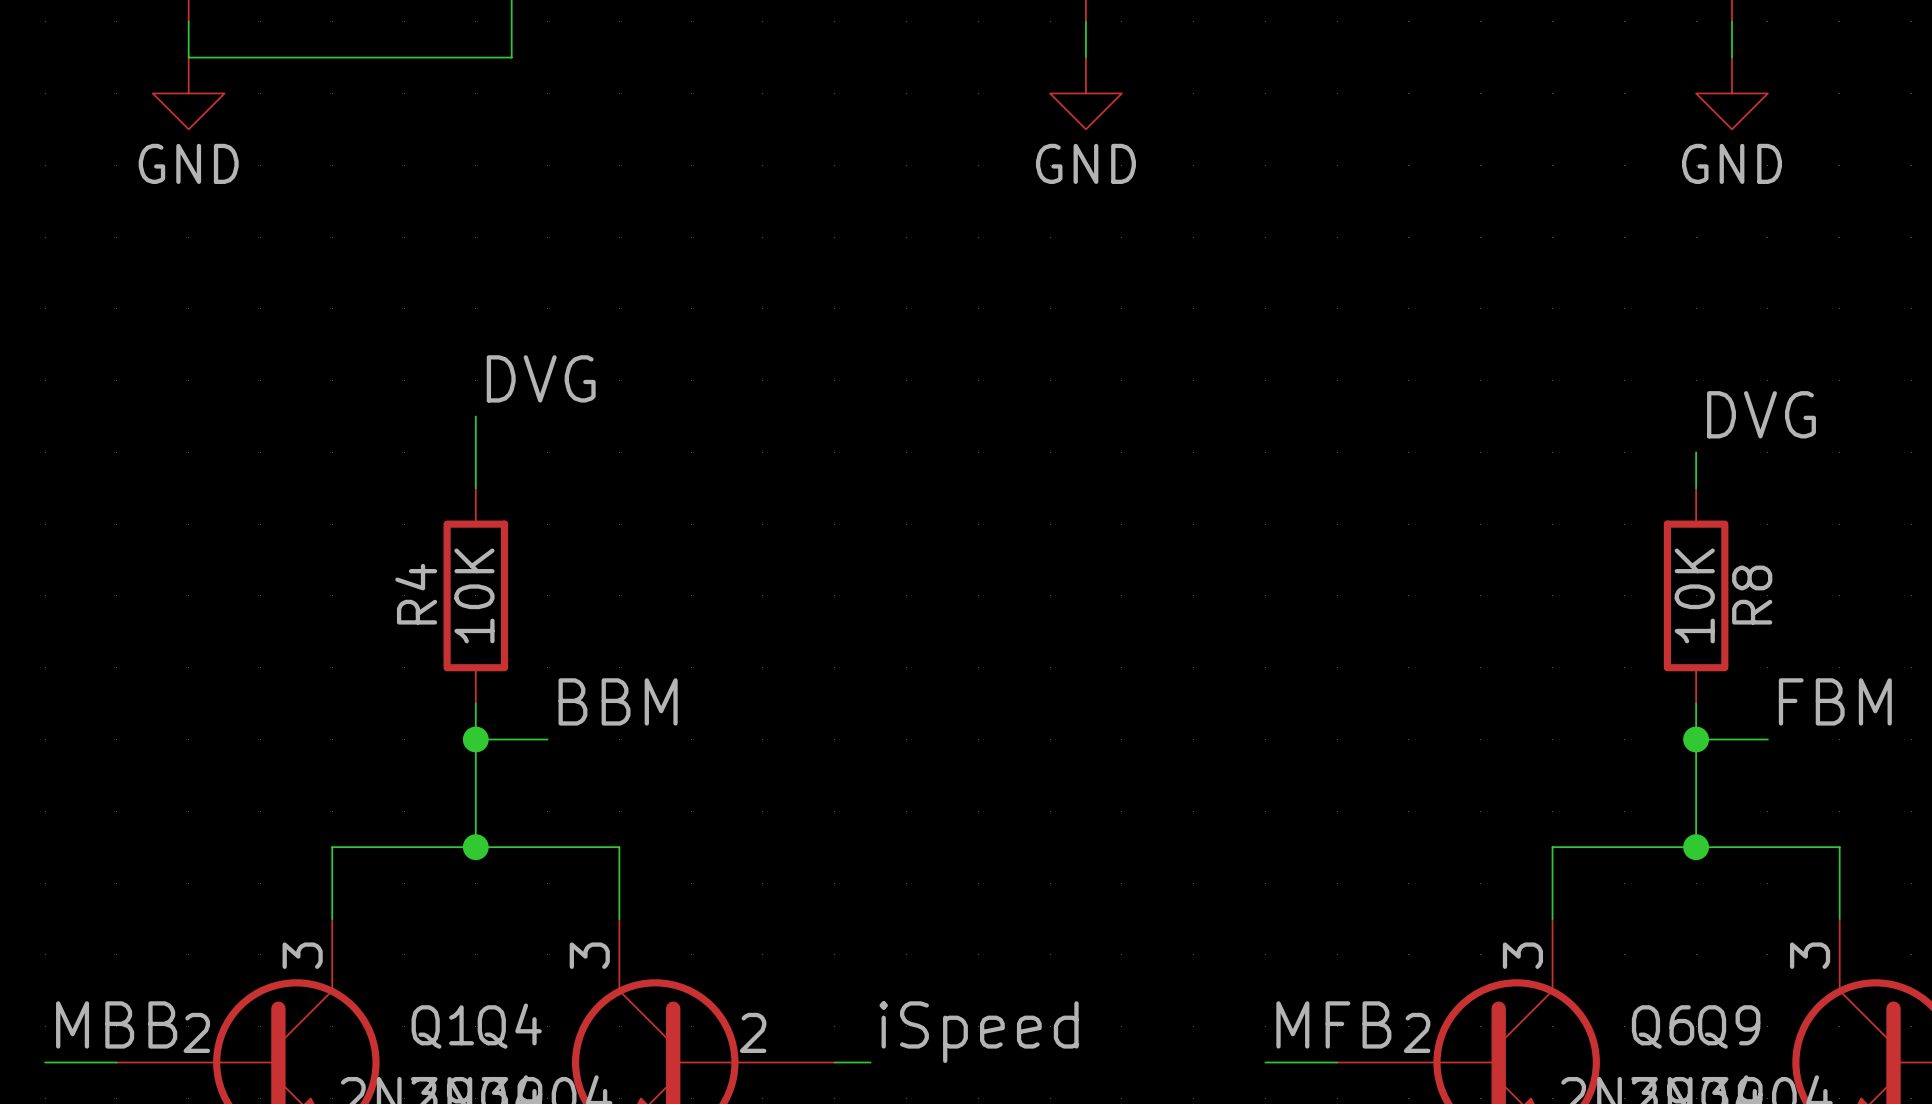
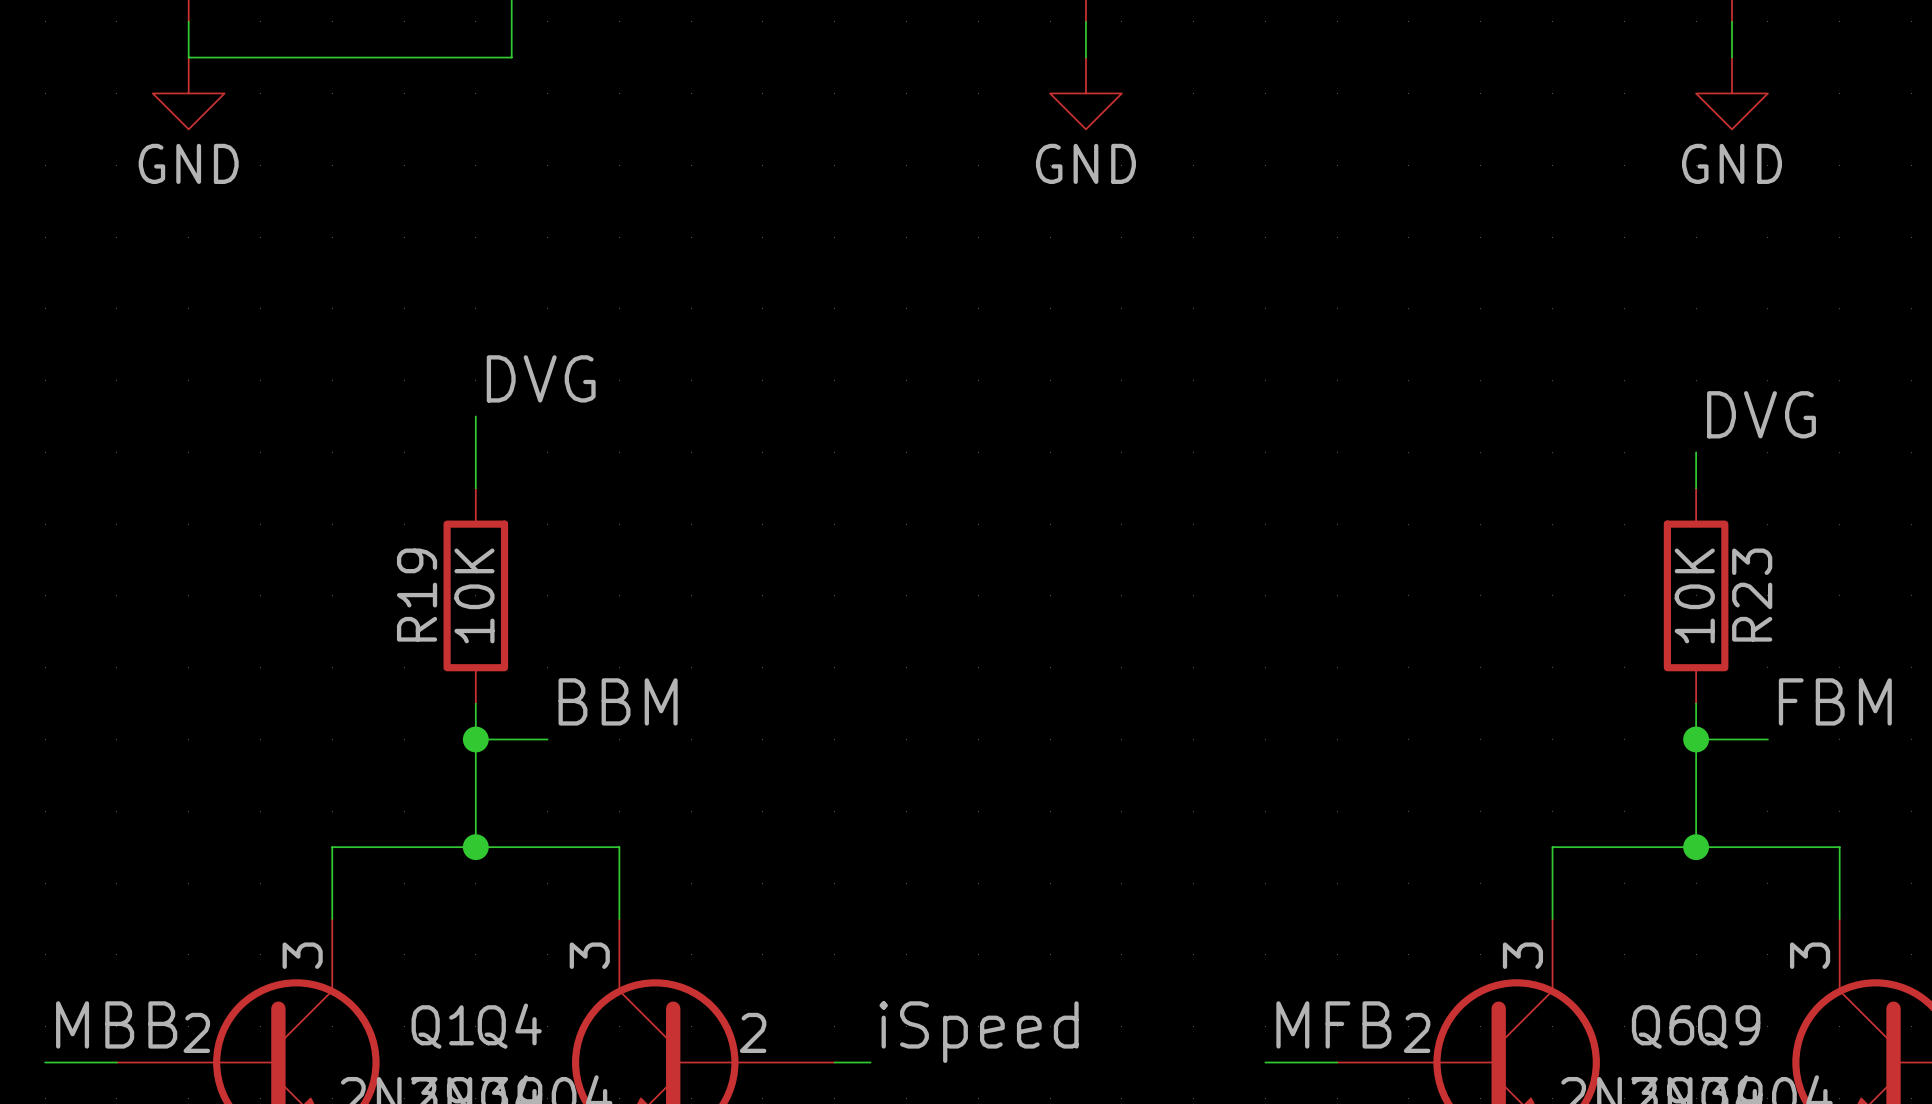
R4 name: R4 (416, 594) -> R19 (417, 595)
R8 name: R8 (1752, 595) -> R23 (1752, 595)

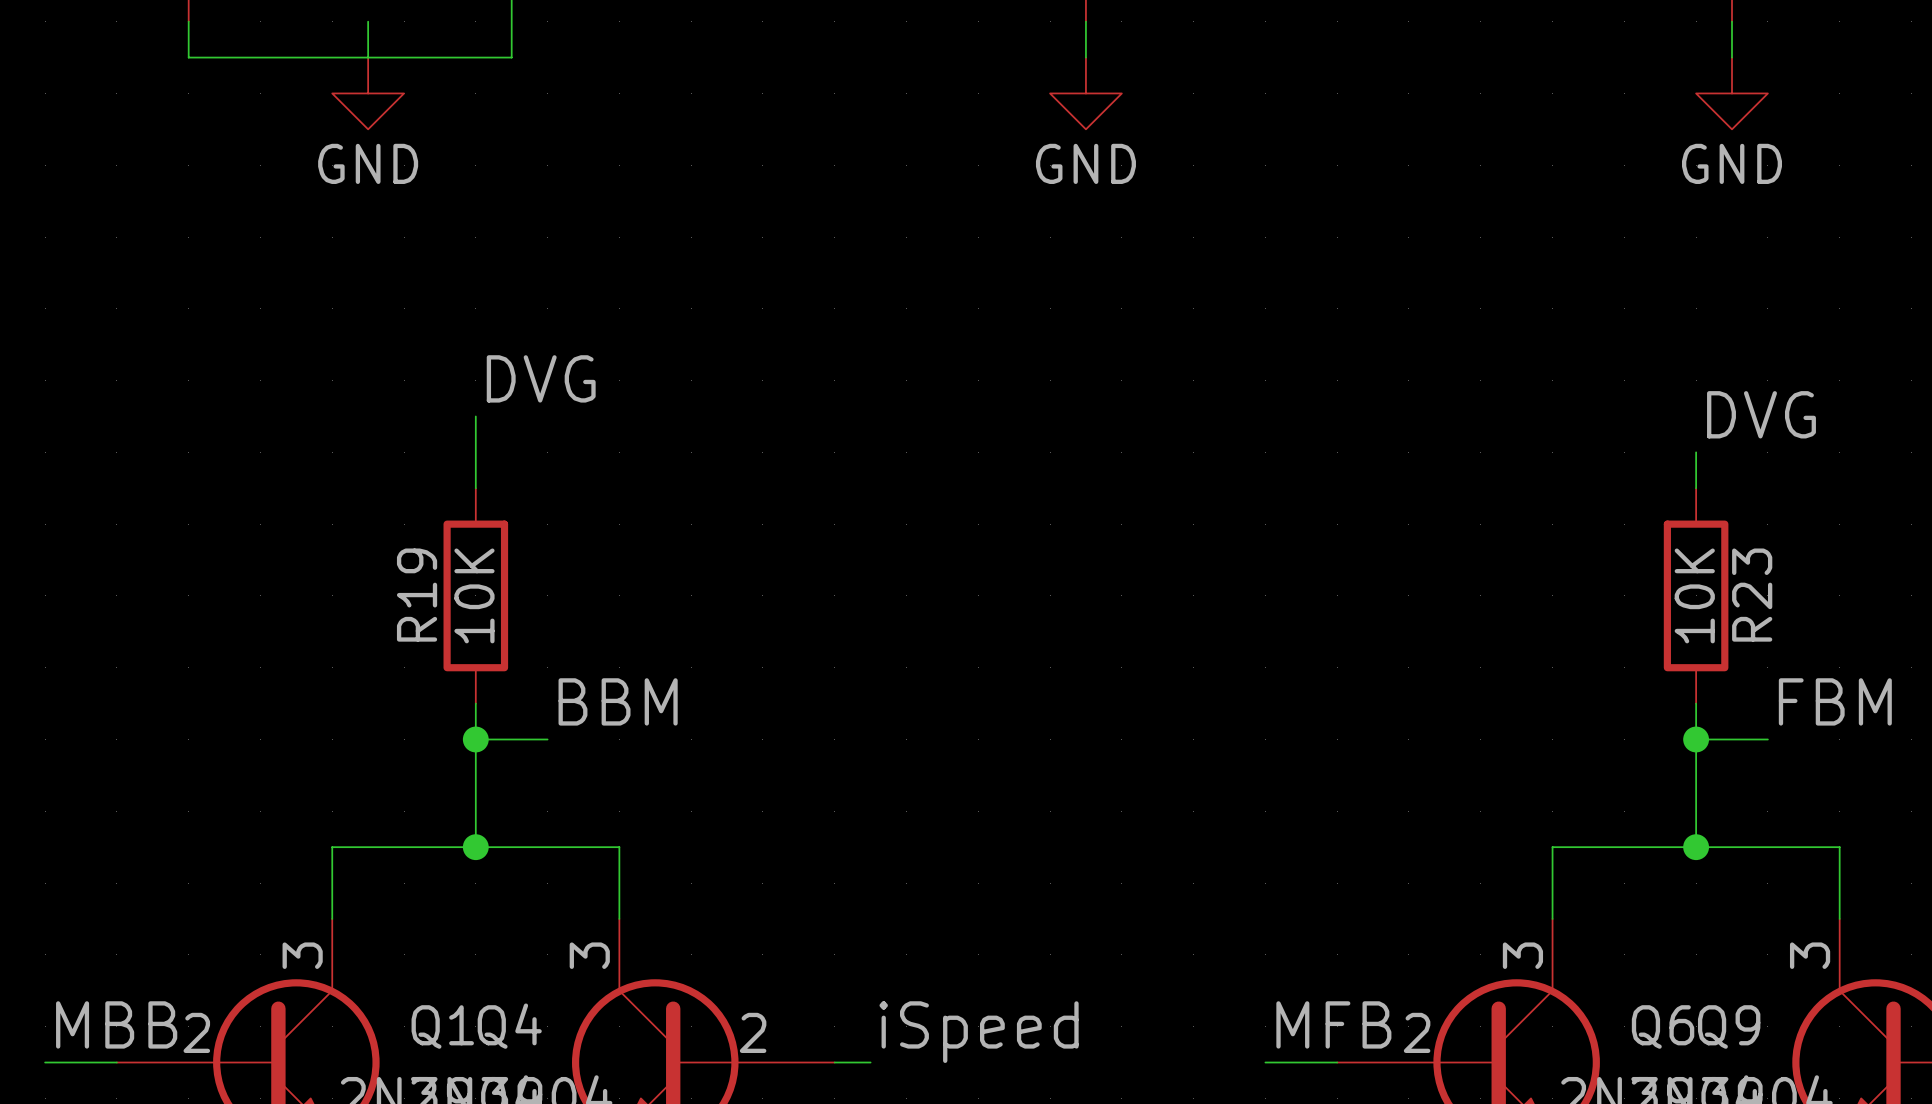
wire: none -> (368, 21) (368, 57)
power symbol position: GND (188, 93) -> GND (368, 93)

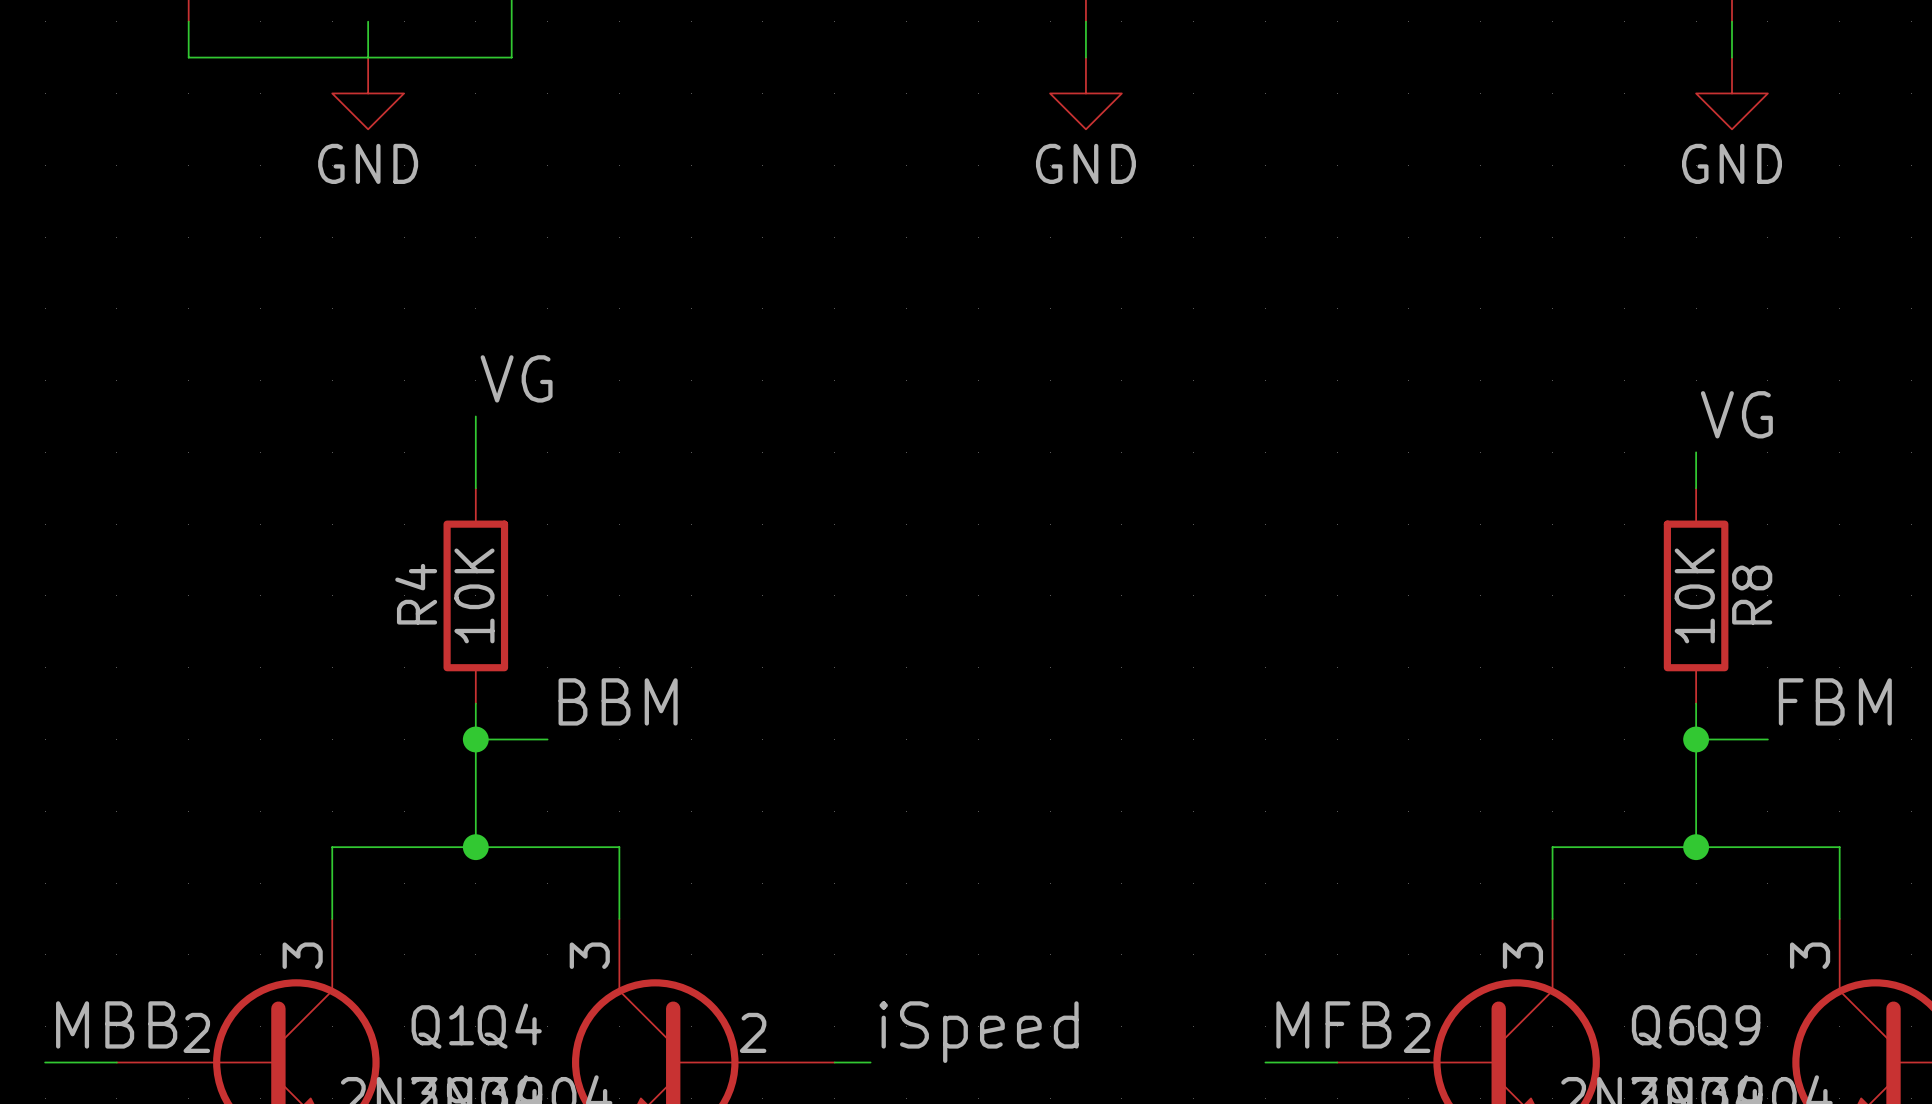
label: DVG (541, 378) -> VG (516, 378)
label: DVG (1761, 414) -> VG (1736, 414)
R19 name: R19 (417, 595) -> R4 (416, 594)
R23 name: R23 (1752, 595) -> R8 (1752, 595)

